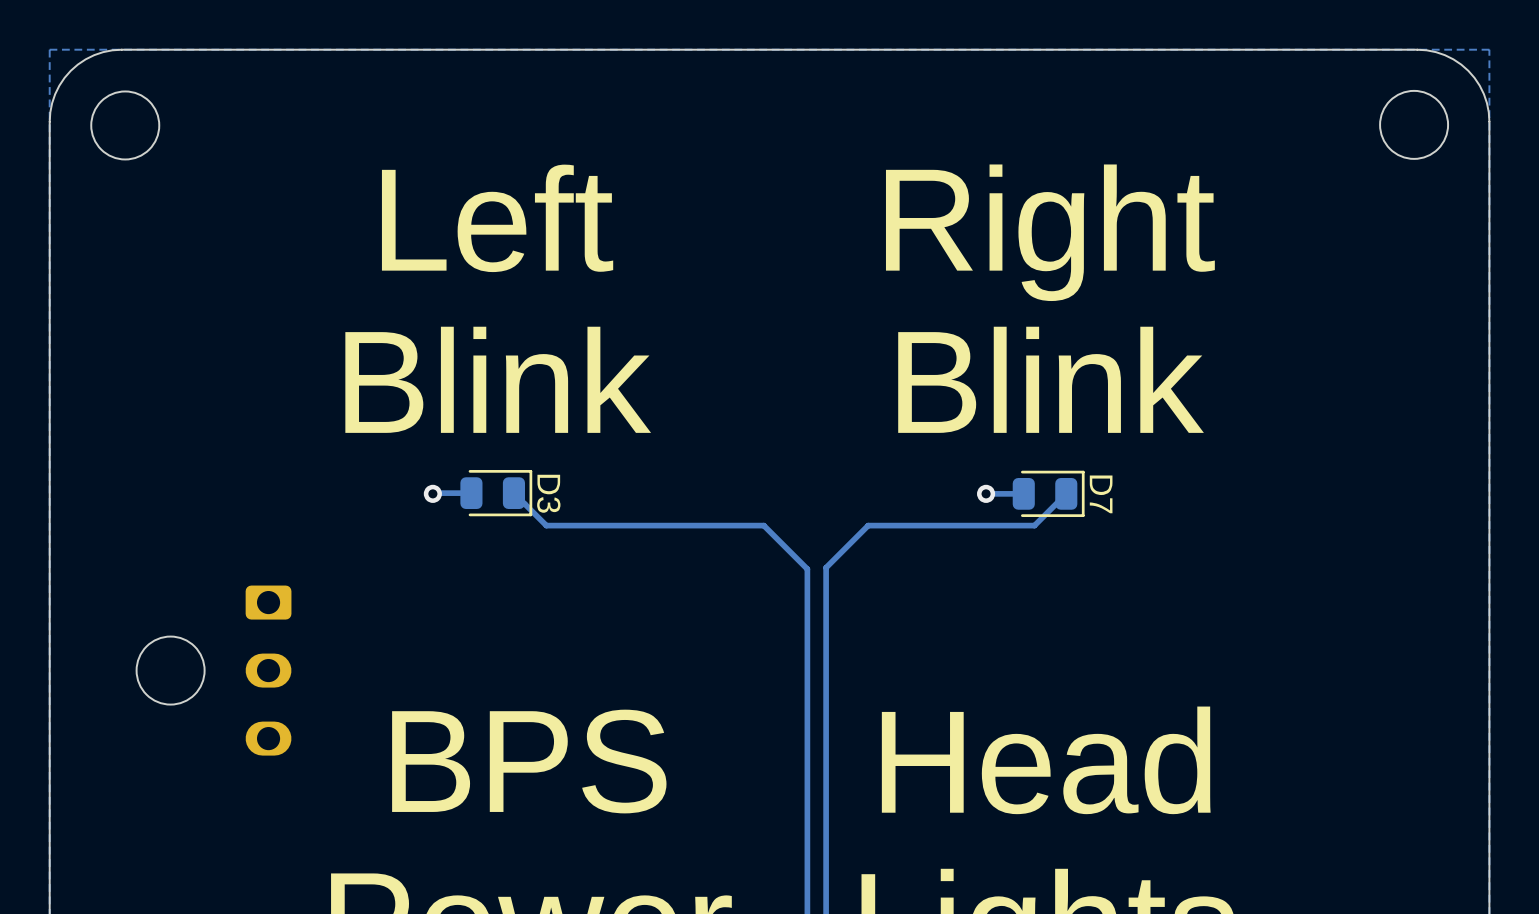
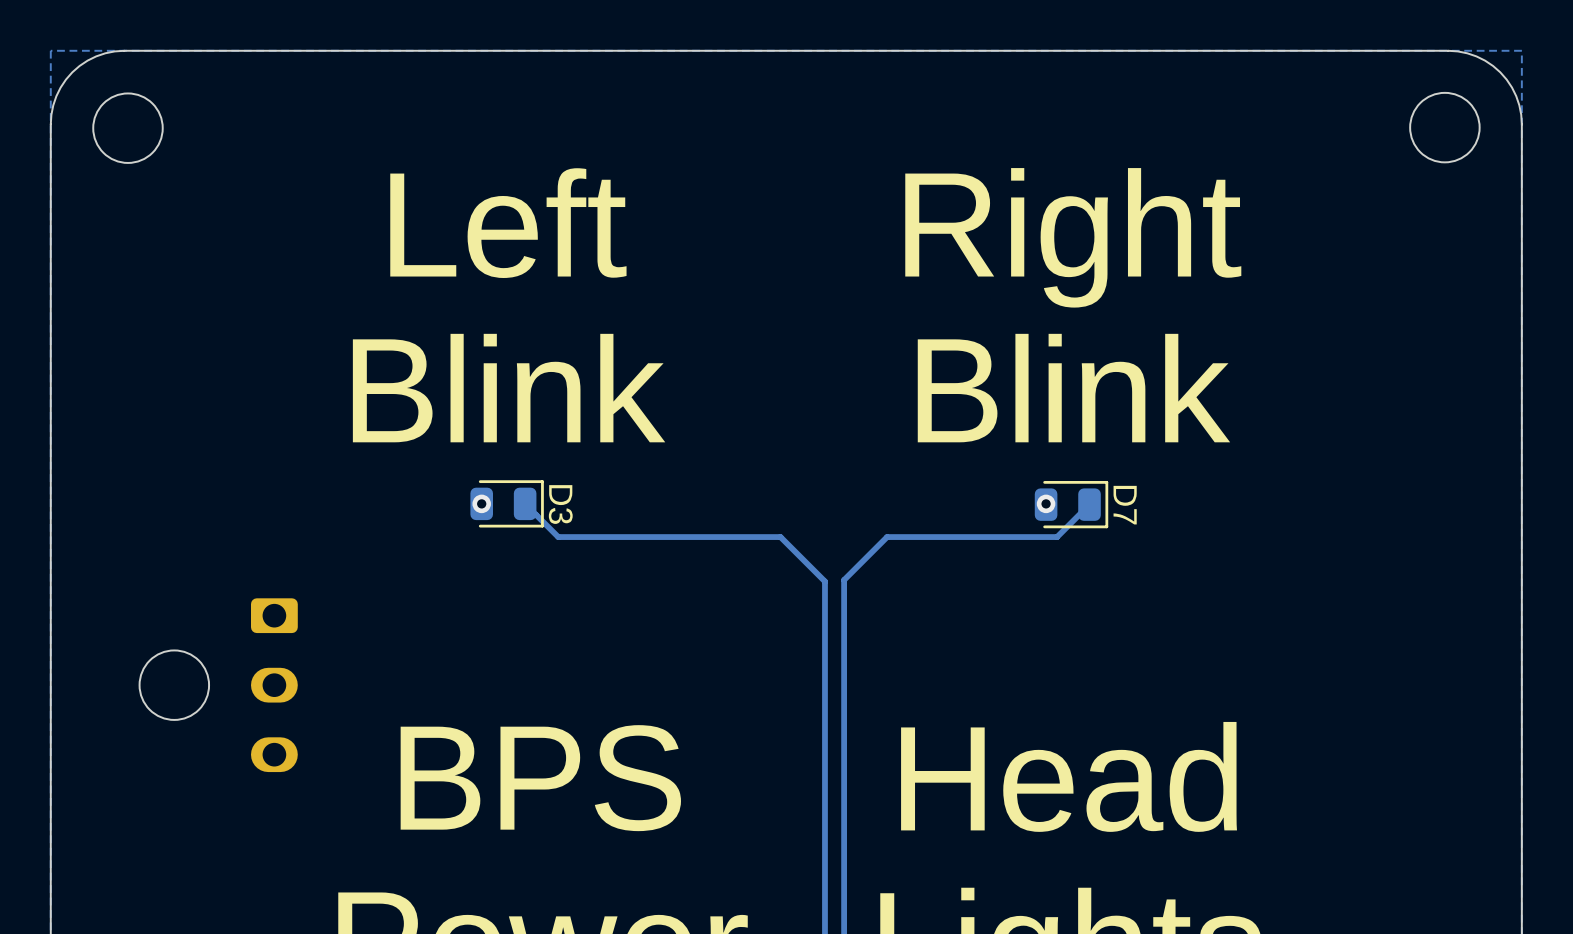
via position: (432, 493) -> (481, 503)
track: (471, 493) (432, 493) -> none
via position: (986, 493) -> (1046, 503)
track: (1023, 493) (986, 493) -> none

